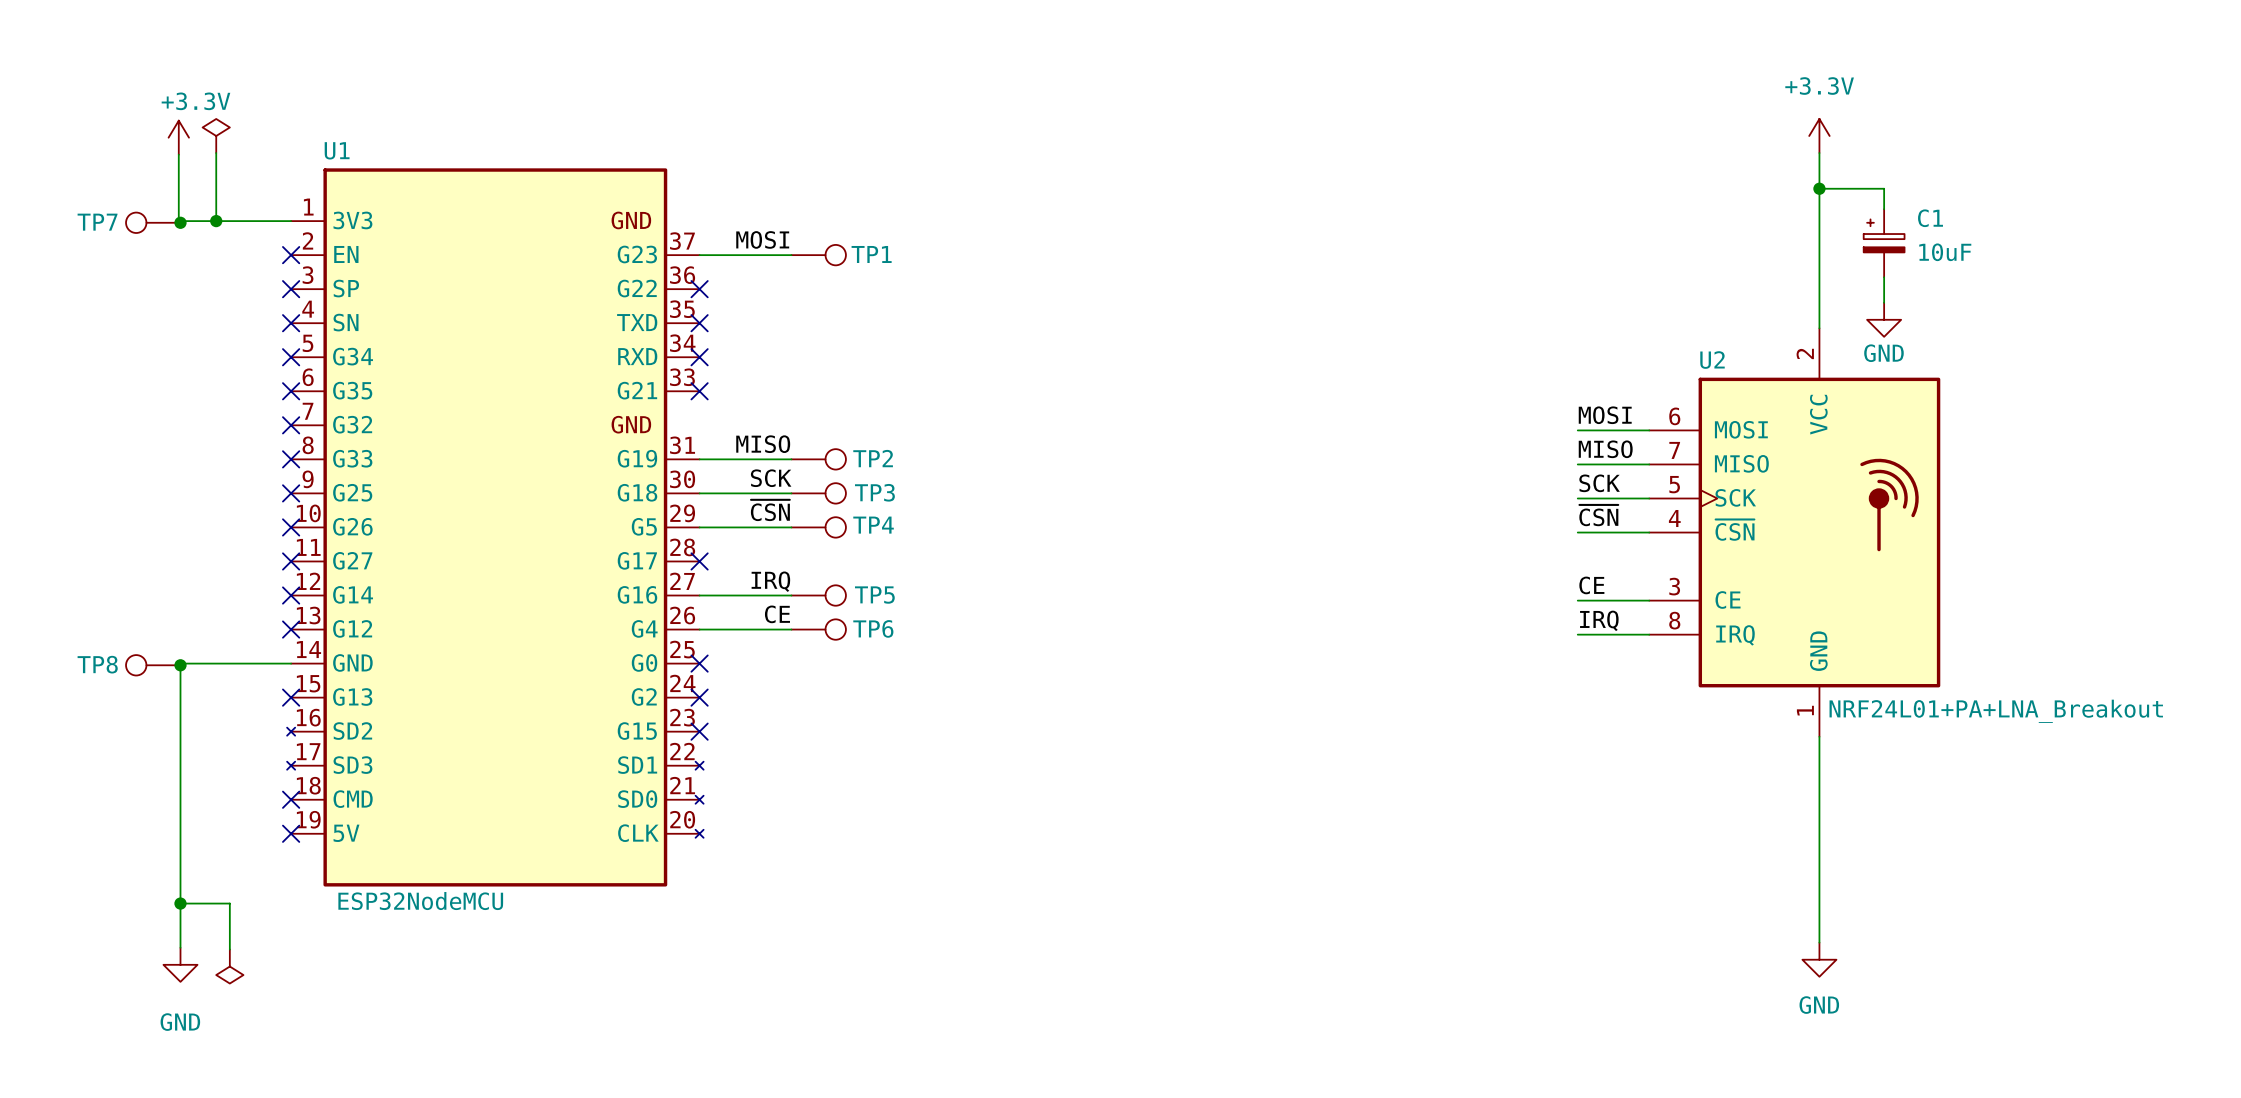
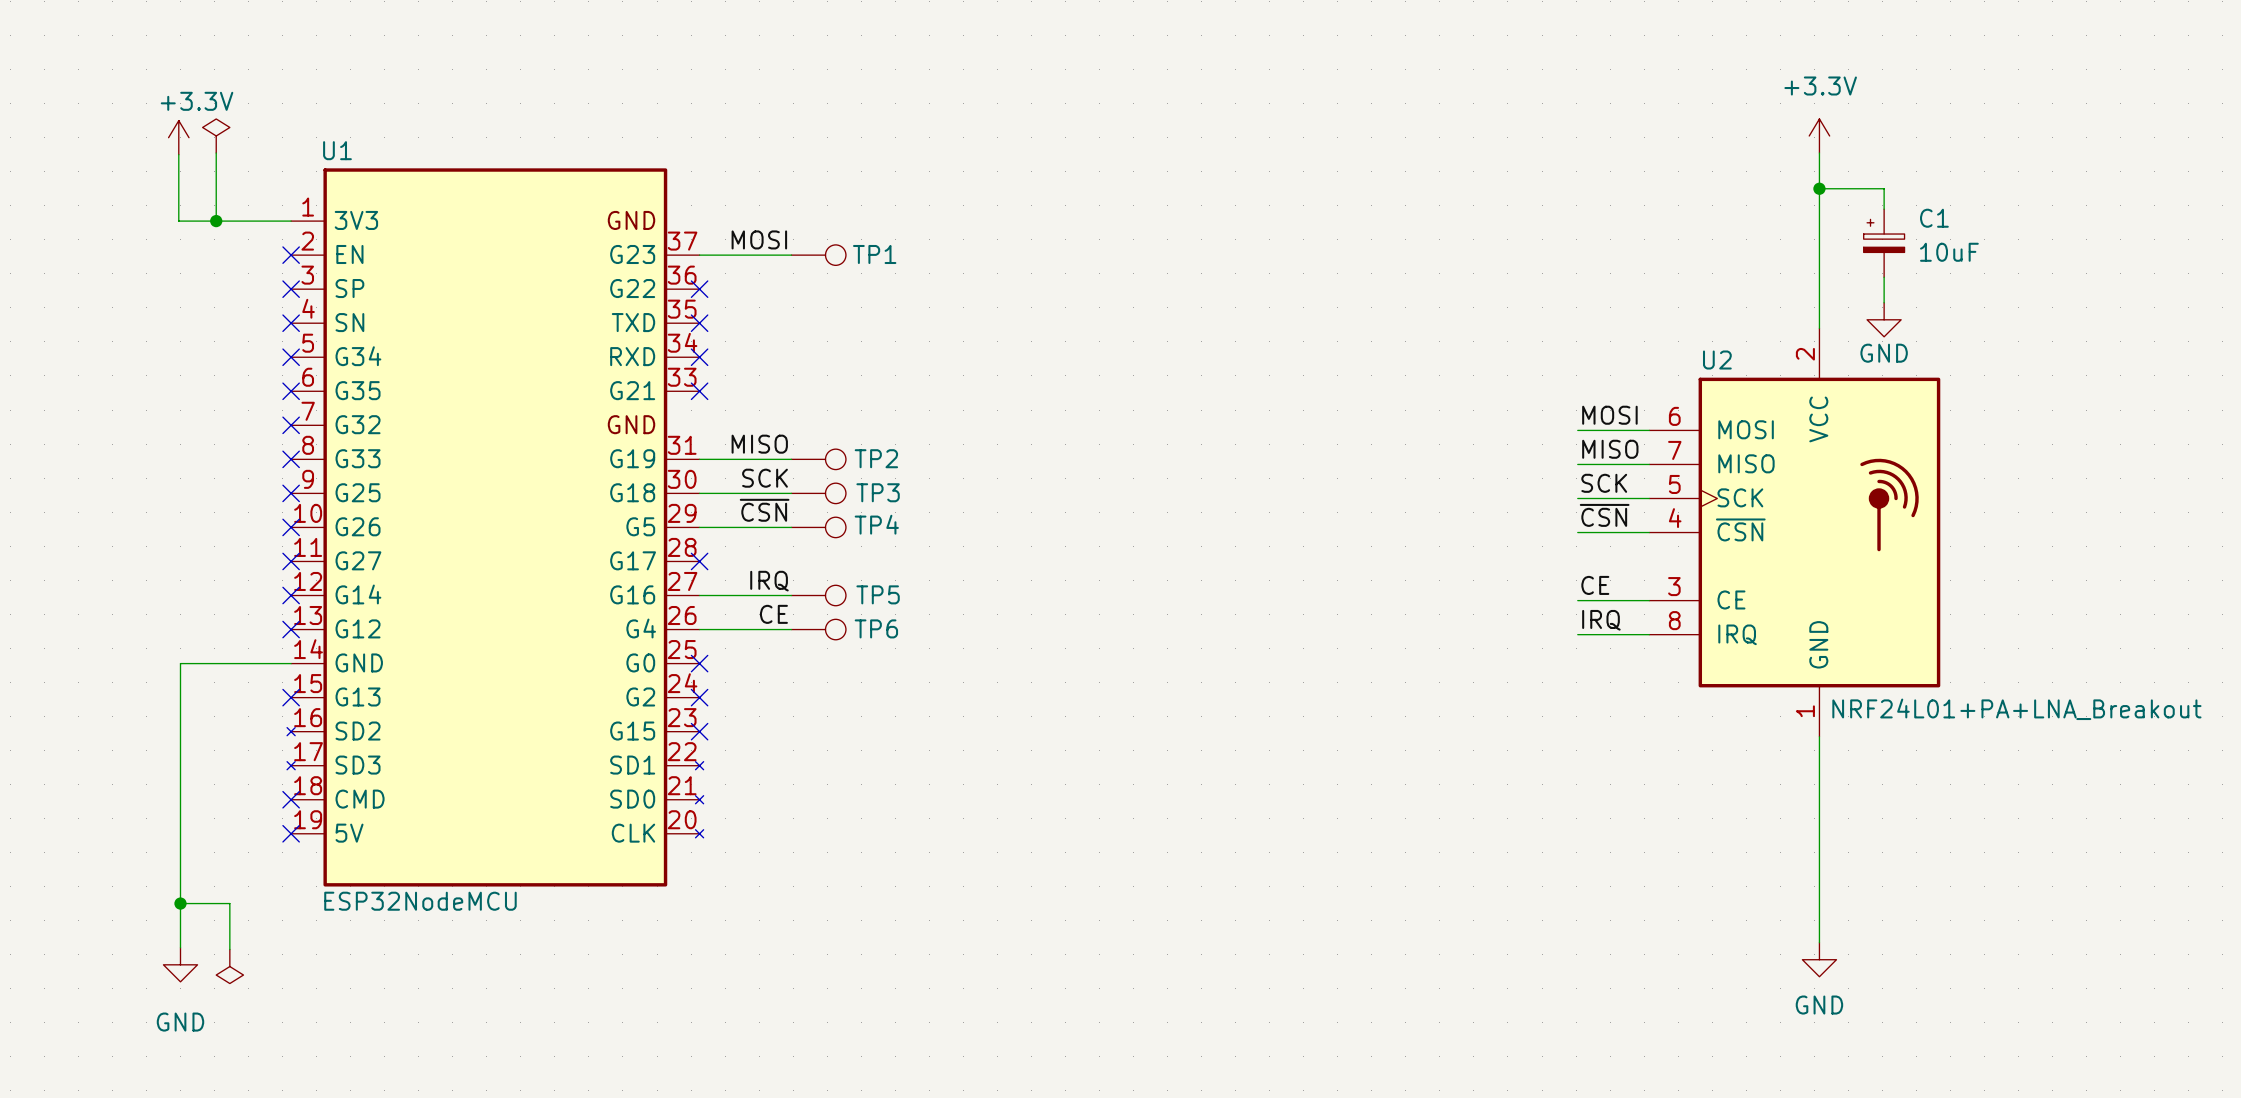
TP7: (153, 222) -> none
junction: (180, 222) -> none
TP8: (153, 665) -> none
junction: (180, 665) -> none

